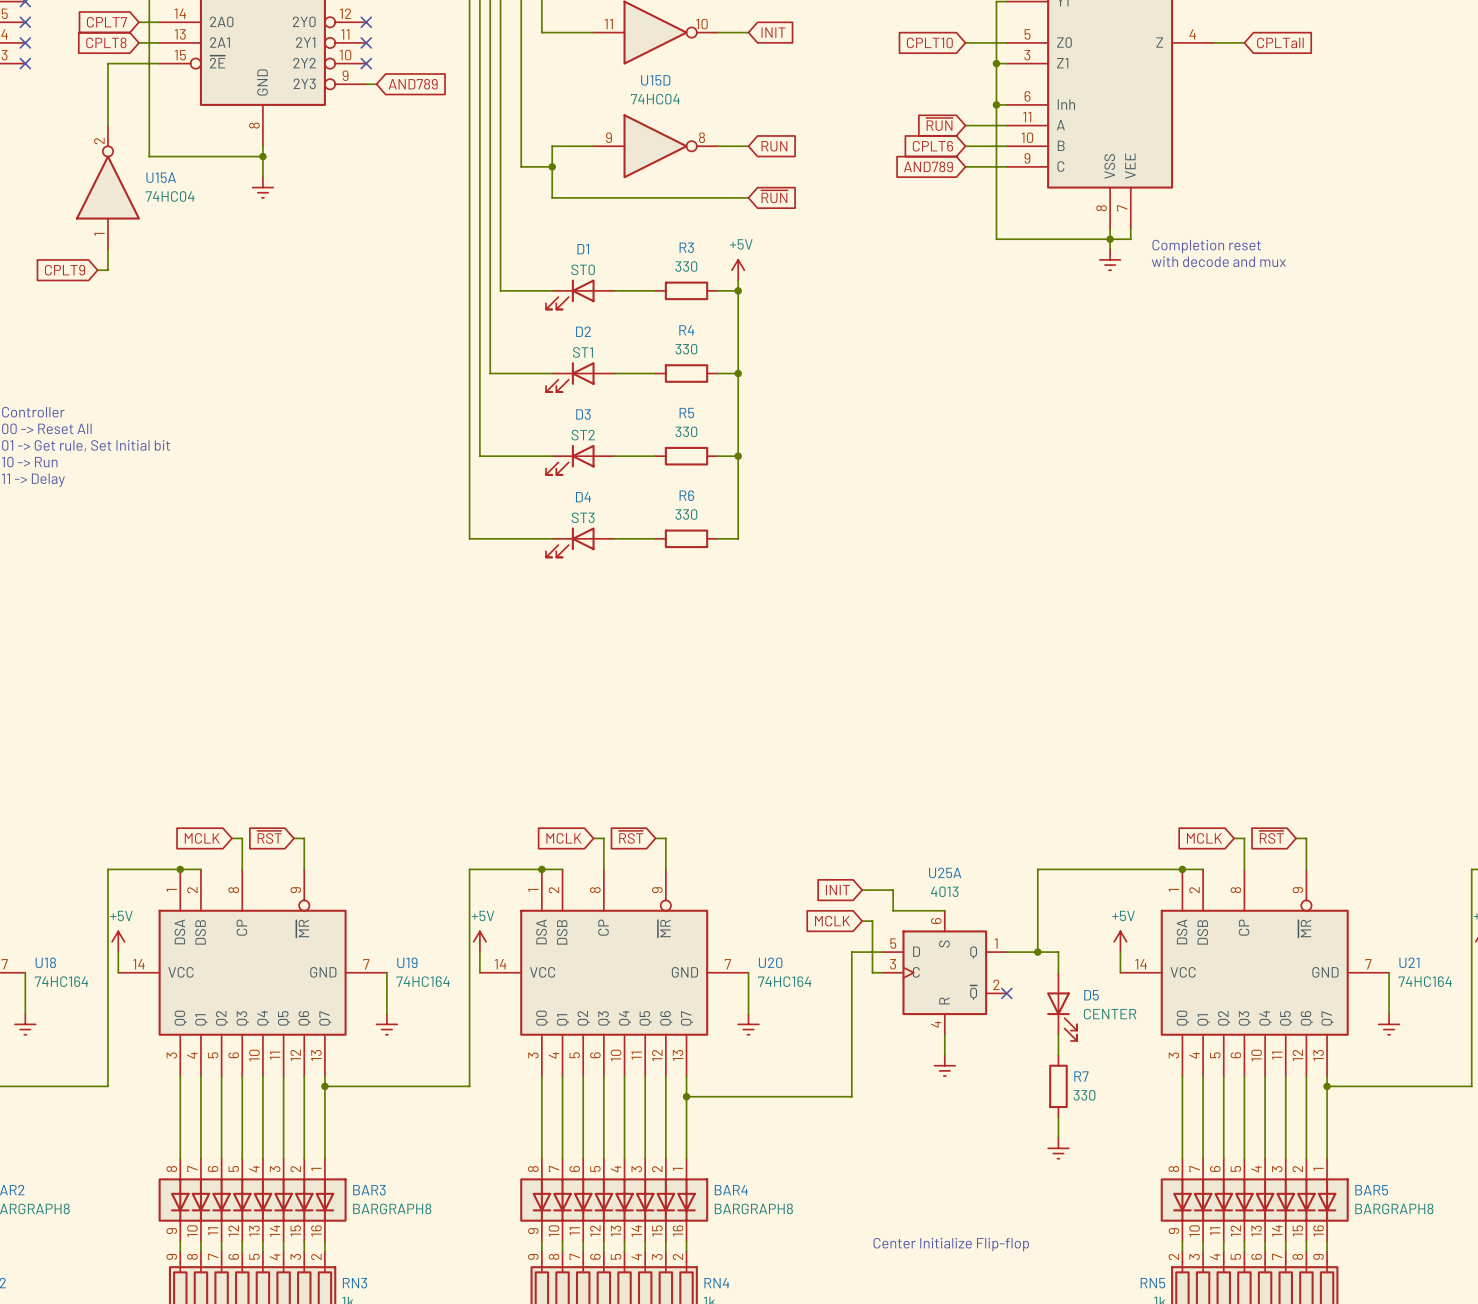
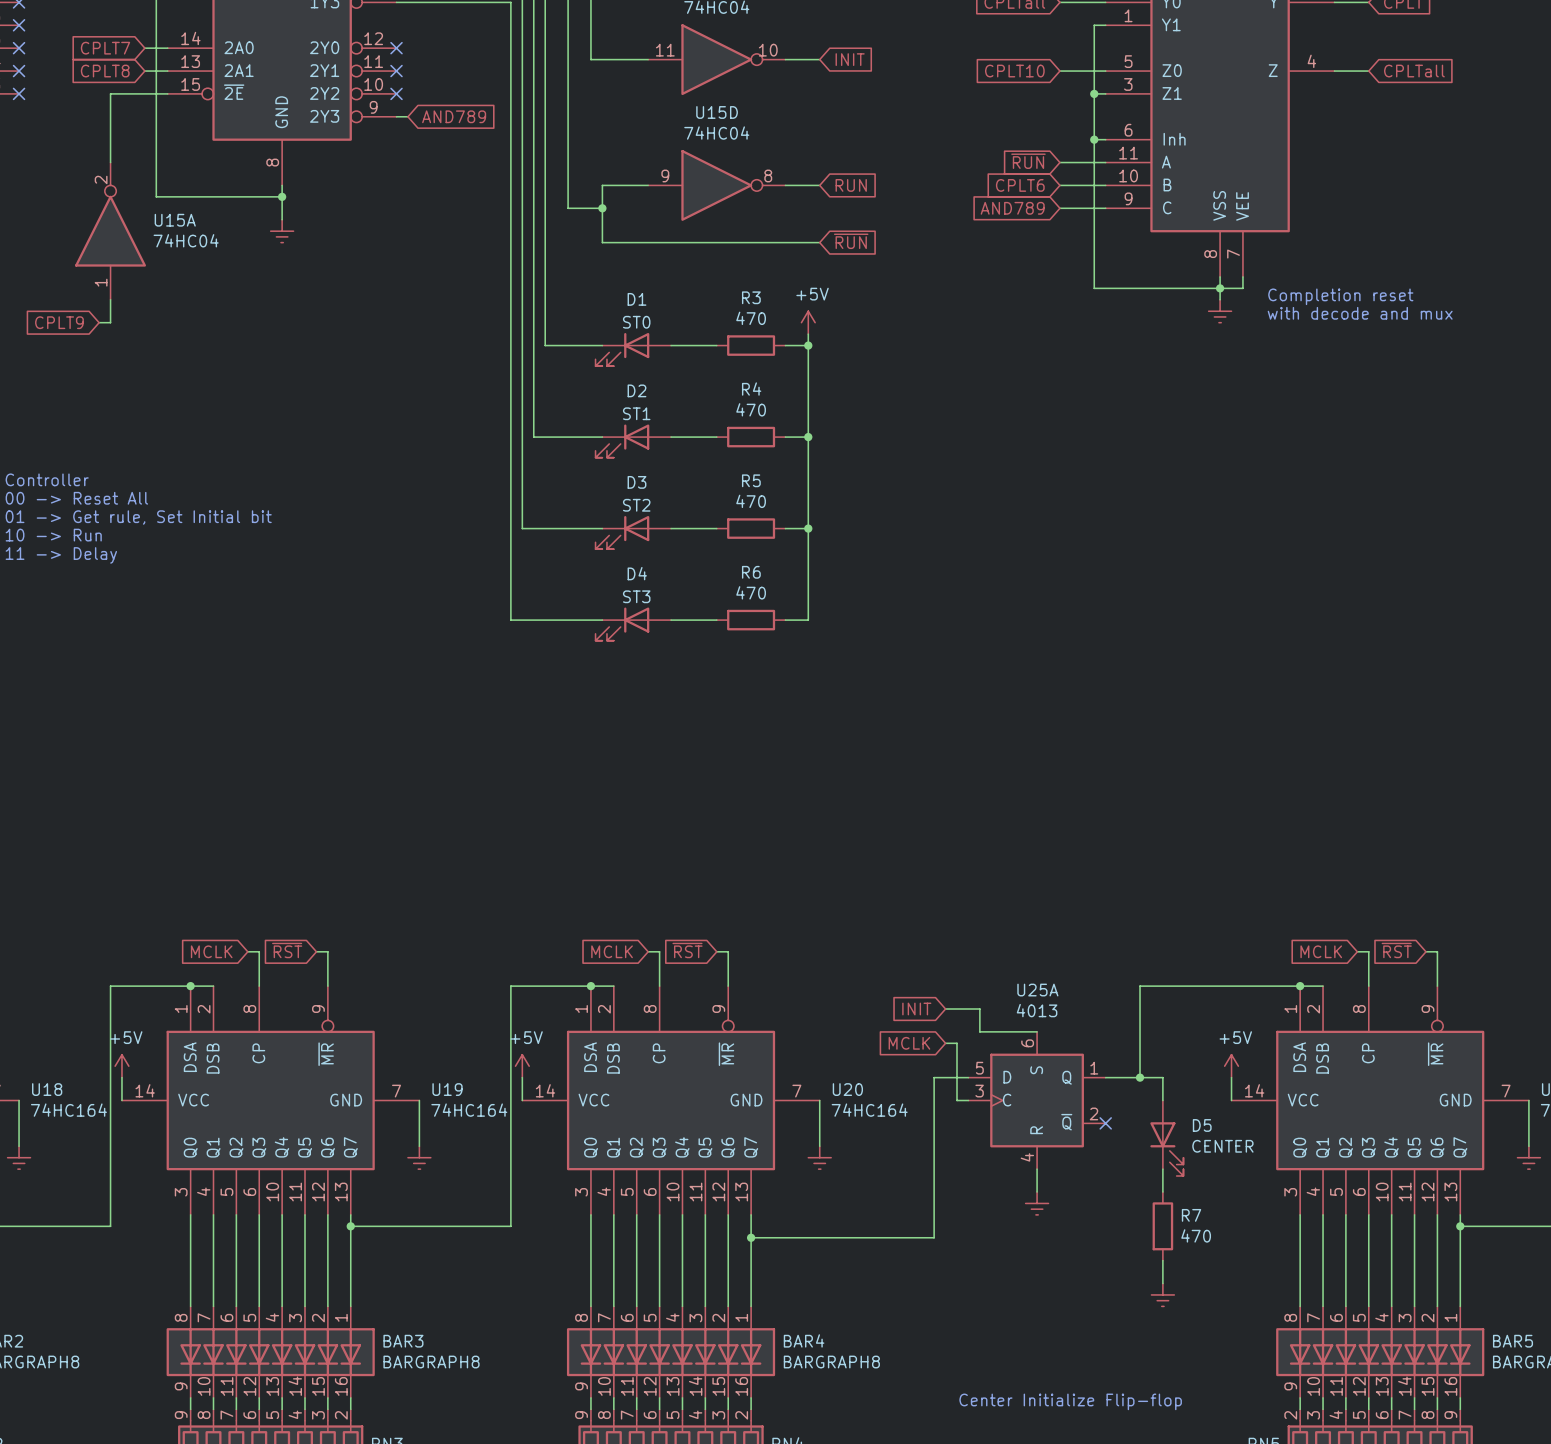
R3 value: 330 (686, 266) -> 470 (751, 318)
R4 value: 330 (686, 349) -> 470 (751, 409)
R5 value: 330 (686, 431) -> 470 (751, 501)
R6 value: 330 (686, 514) -> 470 (751, 592)
R7 value: 330 (1084, 1095) -> 470 (1196, 1235)

